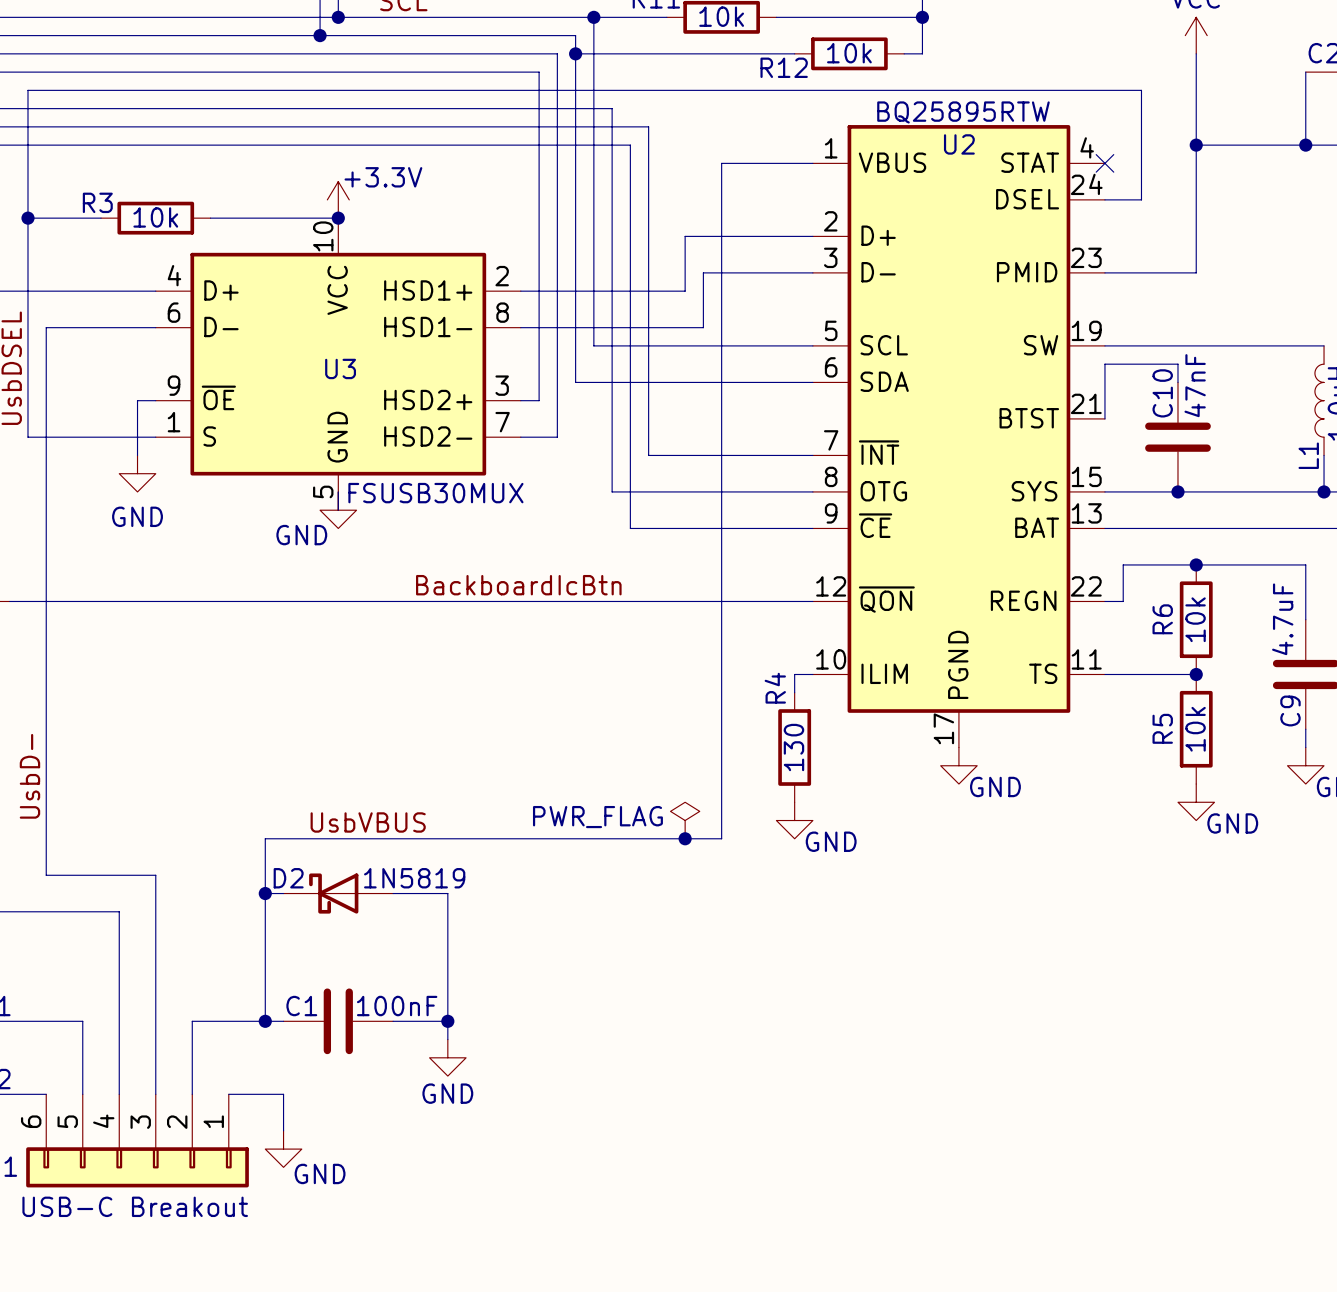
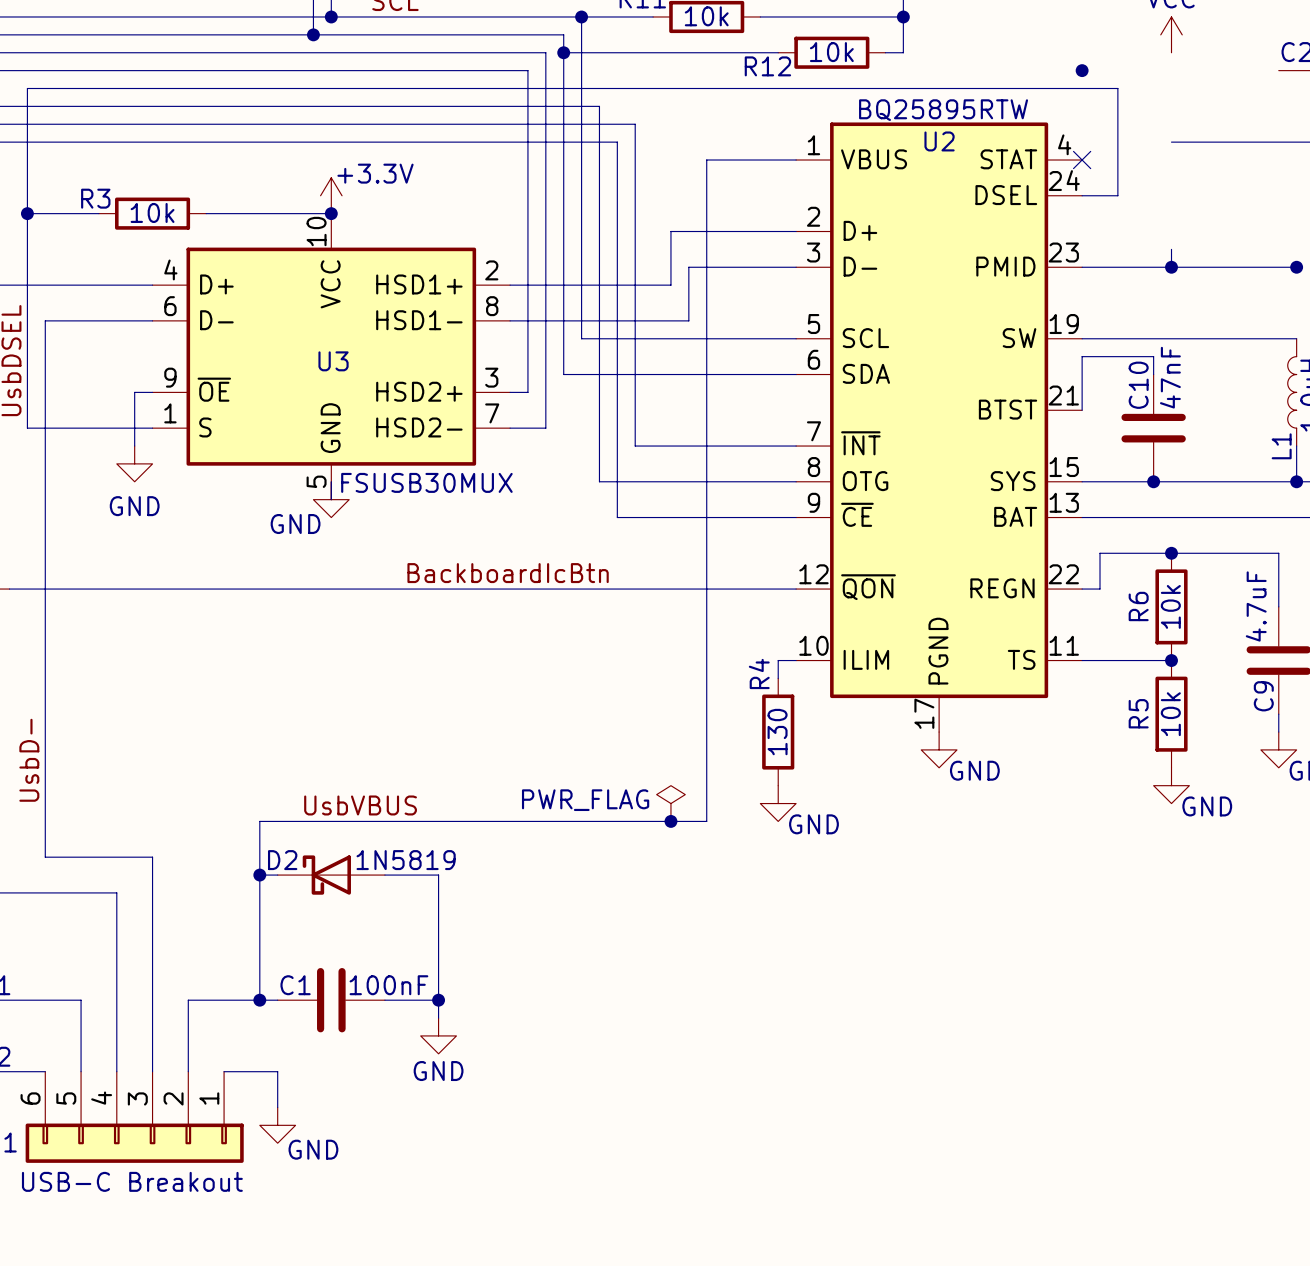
wire: (1196, 53) (1196, 254) -> none
junction: none -> (1082, 70)
wire: (1305, 72) (1305, 145) -> none
junction: (1196, 145) -> none
junction: (1305, 145) -> none
wire: none -> (1171, 267) (1296, 267)
junction: none -> (1171, 267)
junction: none -> (1296, 267)

